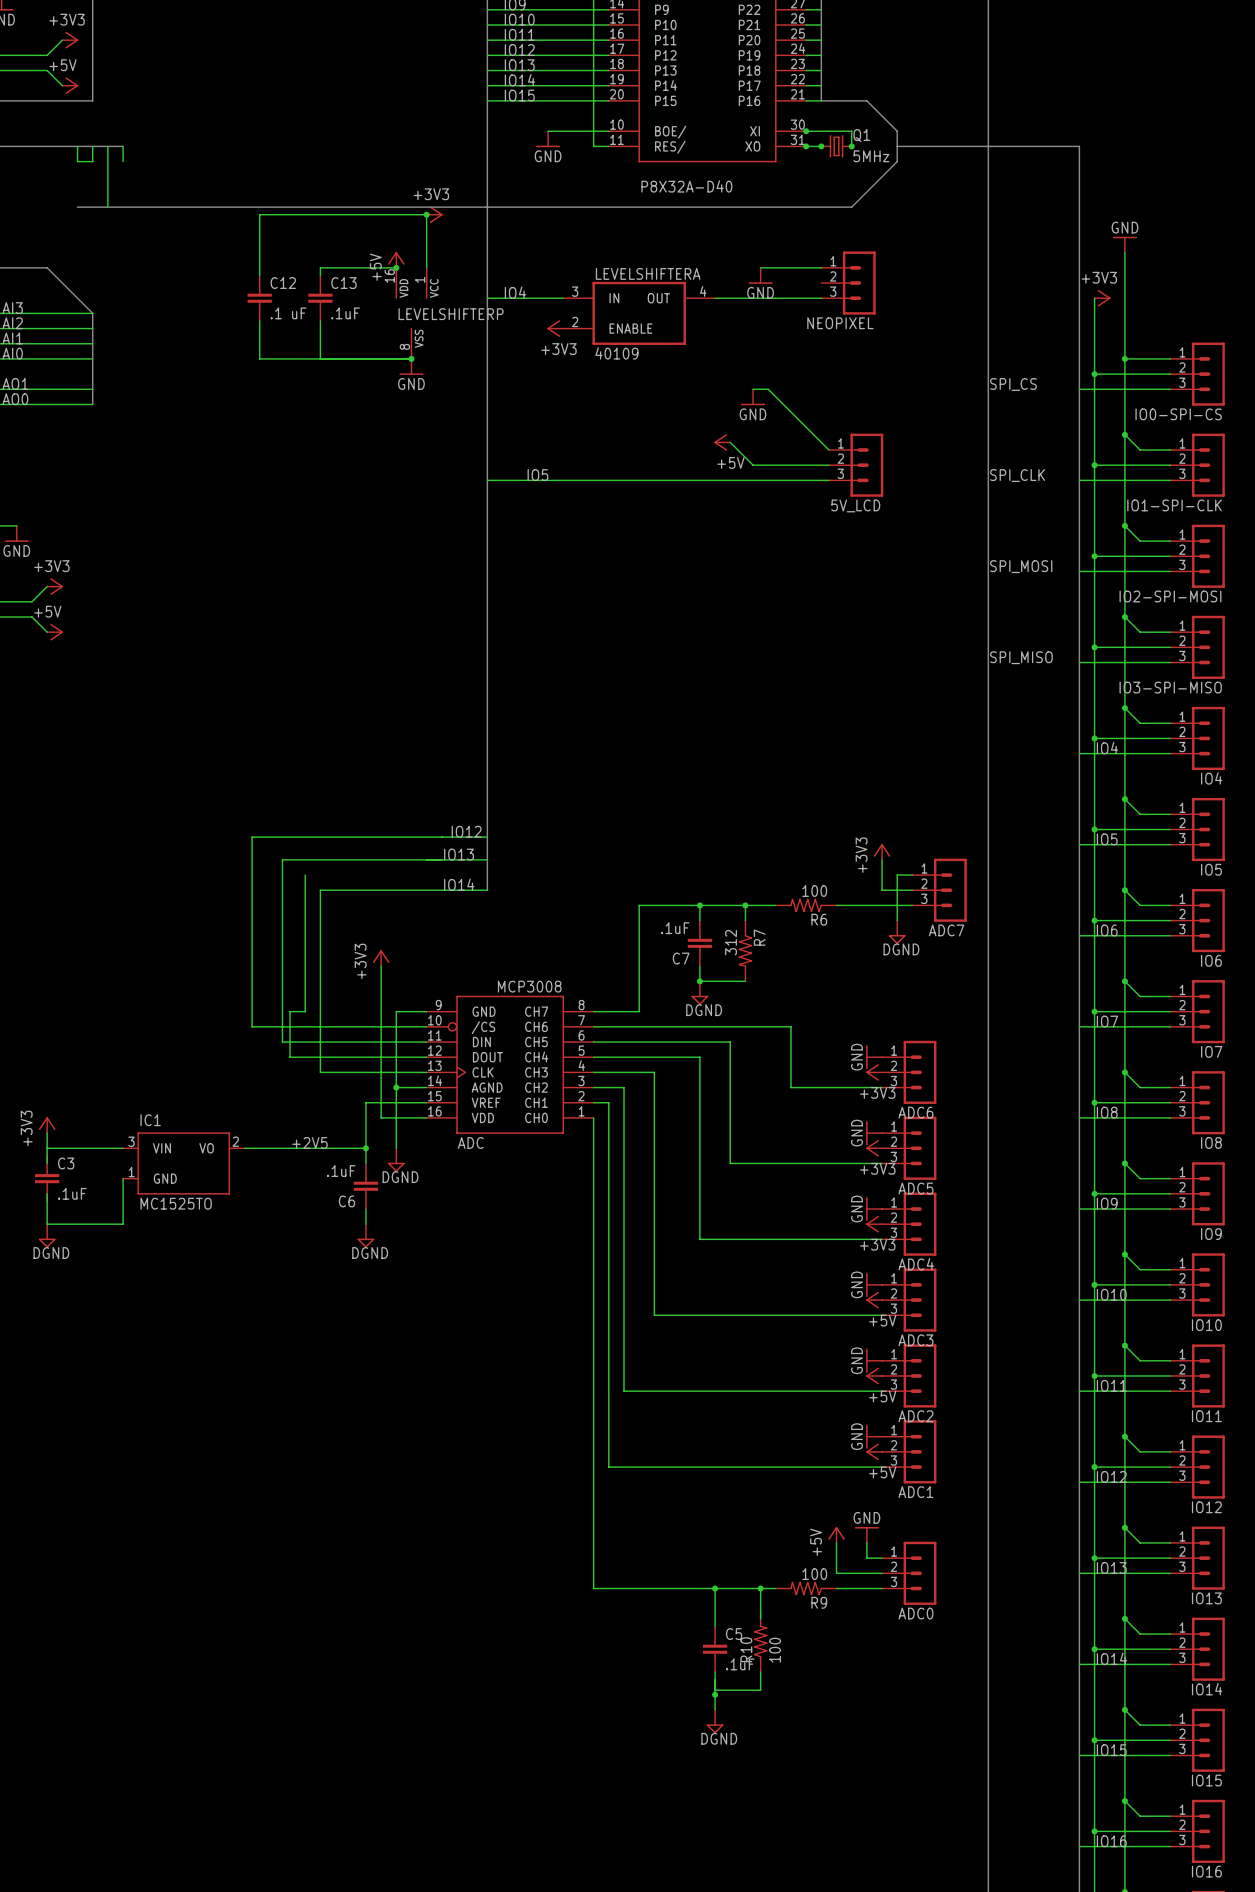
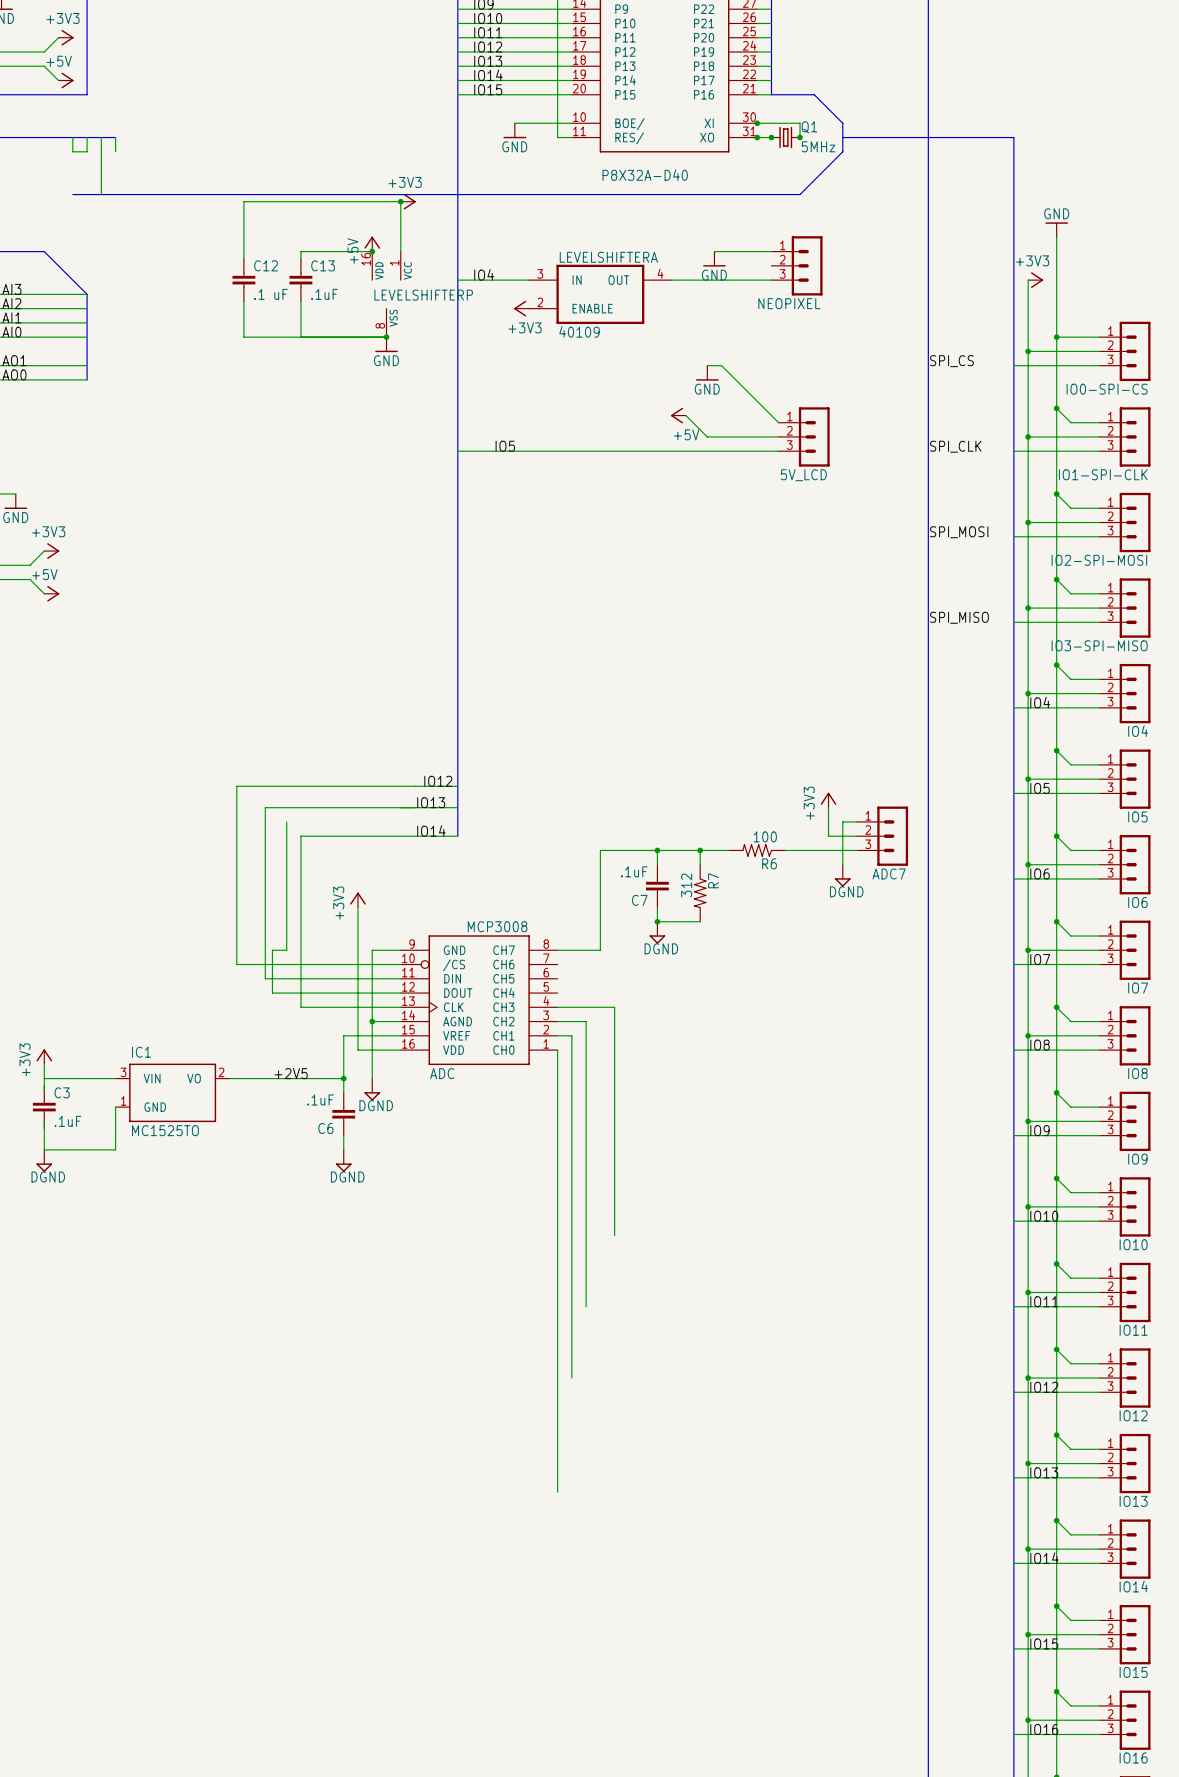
wire: (593, 1026) (790, 1026) (790, 1087) (882, 1087) -> none
wire: (593, 1042) (730, 1042) (730, 1163) (882, 1163) -> none
wire: (593, 1057) (699, 1057) (699, 1239) (882, 1239) -> none
power symbol: GND (874, 1057) -> none
power symbol: +3V3 (874, 1072) -> none
ADC6: (909, 1072) -> none
power symbol: GND (874, 1133) -> none
power symbol: +3V3 (874, 1148) -> none
ADC5: (909, 1148) -> none
power symbol: GND (874, 1209) -> none
power symbol: +3V3 (874, 1224) -> none
ADC4: (909, 1224) -> none
power symbol: GND (874, 1284) -> none
power symbol: +5V (874, 1300) -> none
ADC3: (909, 1300) -> none
wire: (654, 1315) (882, 1315) -> none
power symbol: GND (874, 1360) -> none
power symbol: +5V (874, 1375) -> none
ADC2: (909, 1375) -> none
wire: (624, 1391) (882, 1391) -> none
power symbol: GND (874, 1436) -> none
power symbol: +5V (874, 1451) -> none
ADC1: (909, 1451) -> none
wire: (608, 1467) (882, 1467) -> none
power symbol: +5V (836, 1535) -> none
power symbol: GND (866, 1535) -> none
wire: (836, 1542) (836, 1573) (882, 1573) -> none
wire: (866, 1542) (866, 1558) (882, 1558) -> none
ADC0: (909, 1573) -> none
wire: (593, 1588) (775, 1588) -> none
wire: (715, 1588) (715, 1626) -> none
junction: (715, 1588) -> none
wire: (760, 1588) (760, 1618) -> none
junction: (760, 1588) -> none
R9: 100 (806, 1588) -> none
wire: (836, 1588) (882, 1588) -> none
R10: 100 (760, 1641) -> none
C5: .1uF (715, 1649) -> none
wire: (715, 1671) (715, 1709) -> none
wire: (760, 1671) (760, 1690) (715, 1690) -> none
junction: (715, 1694) -> none
power symbol: DGND (715, 1721) -> none

